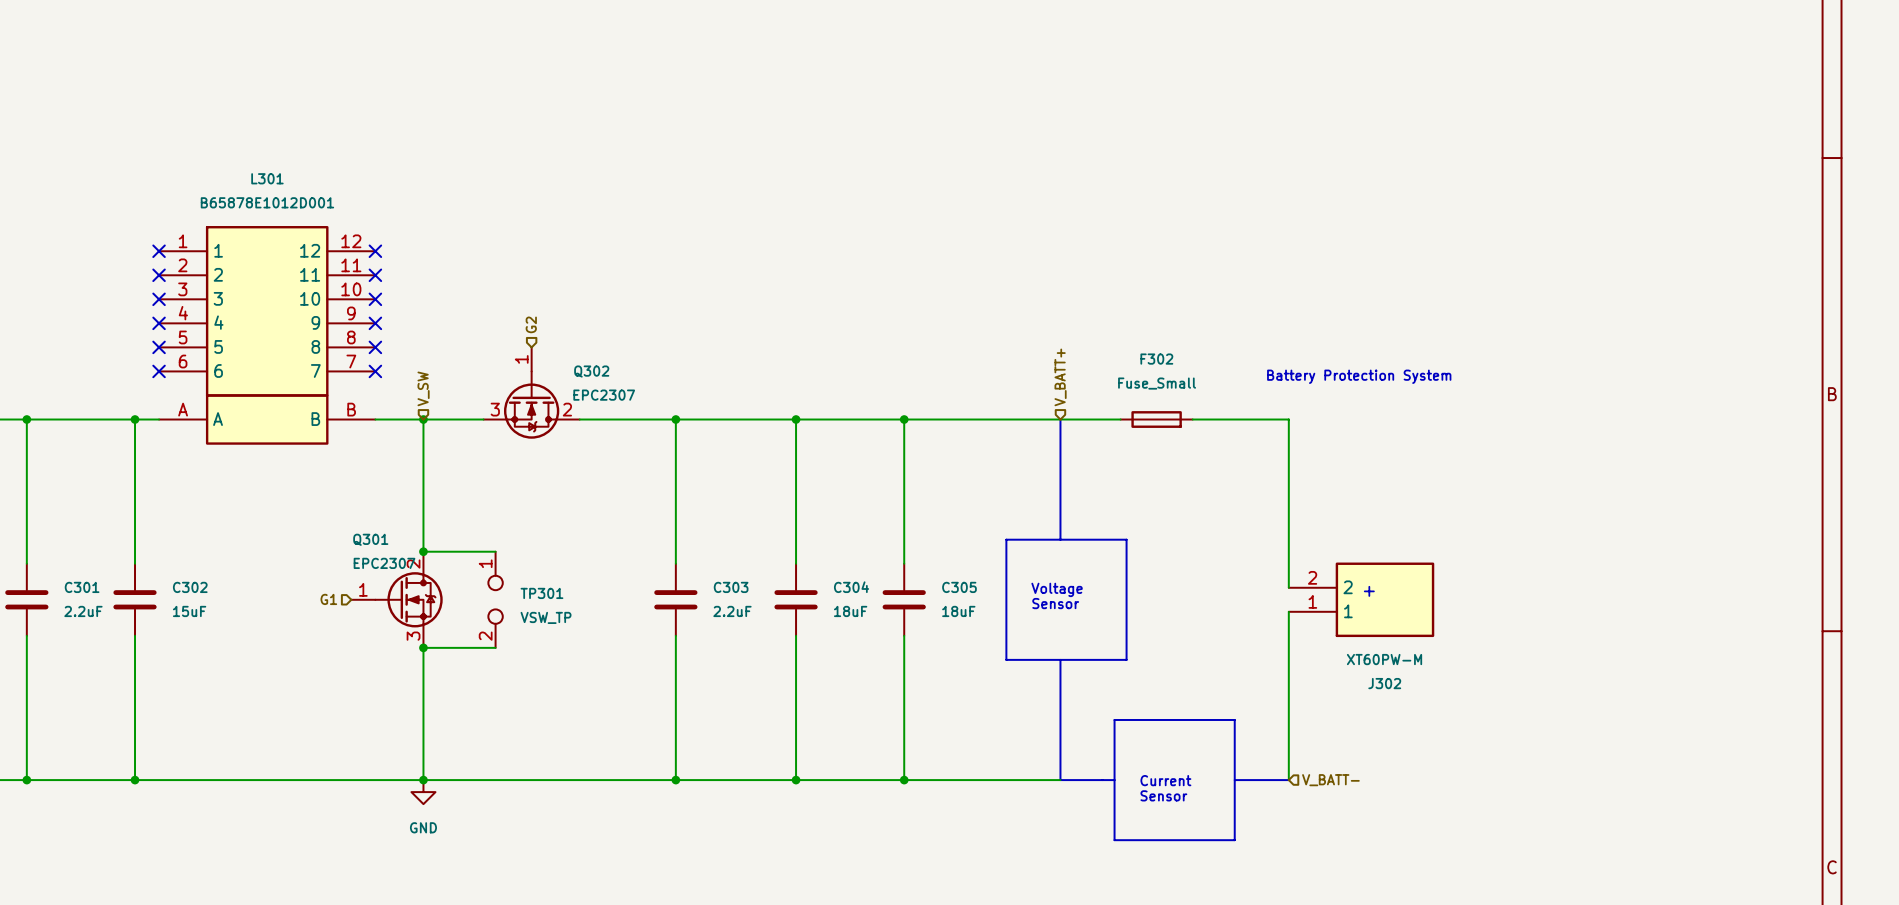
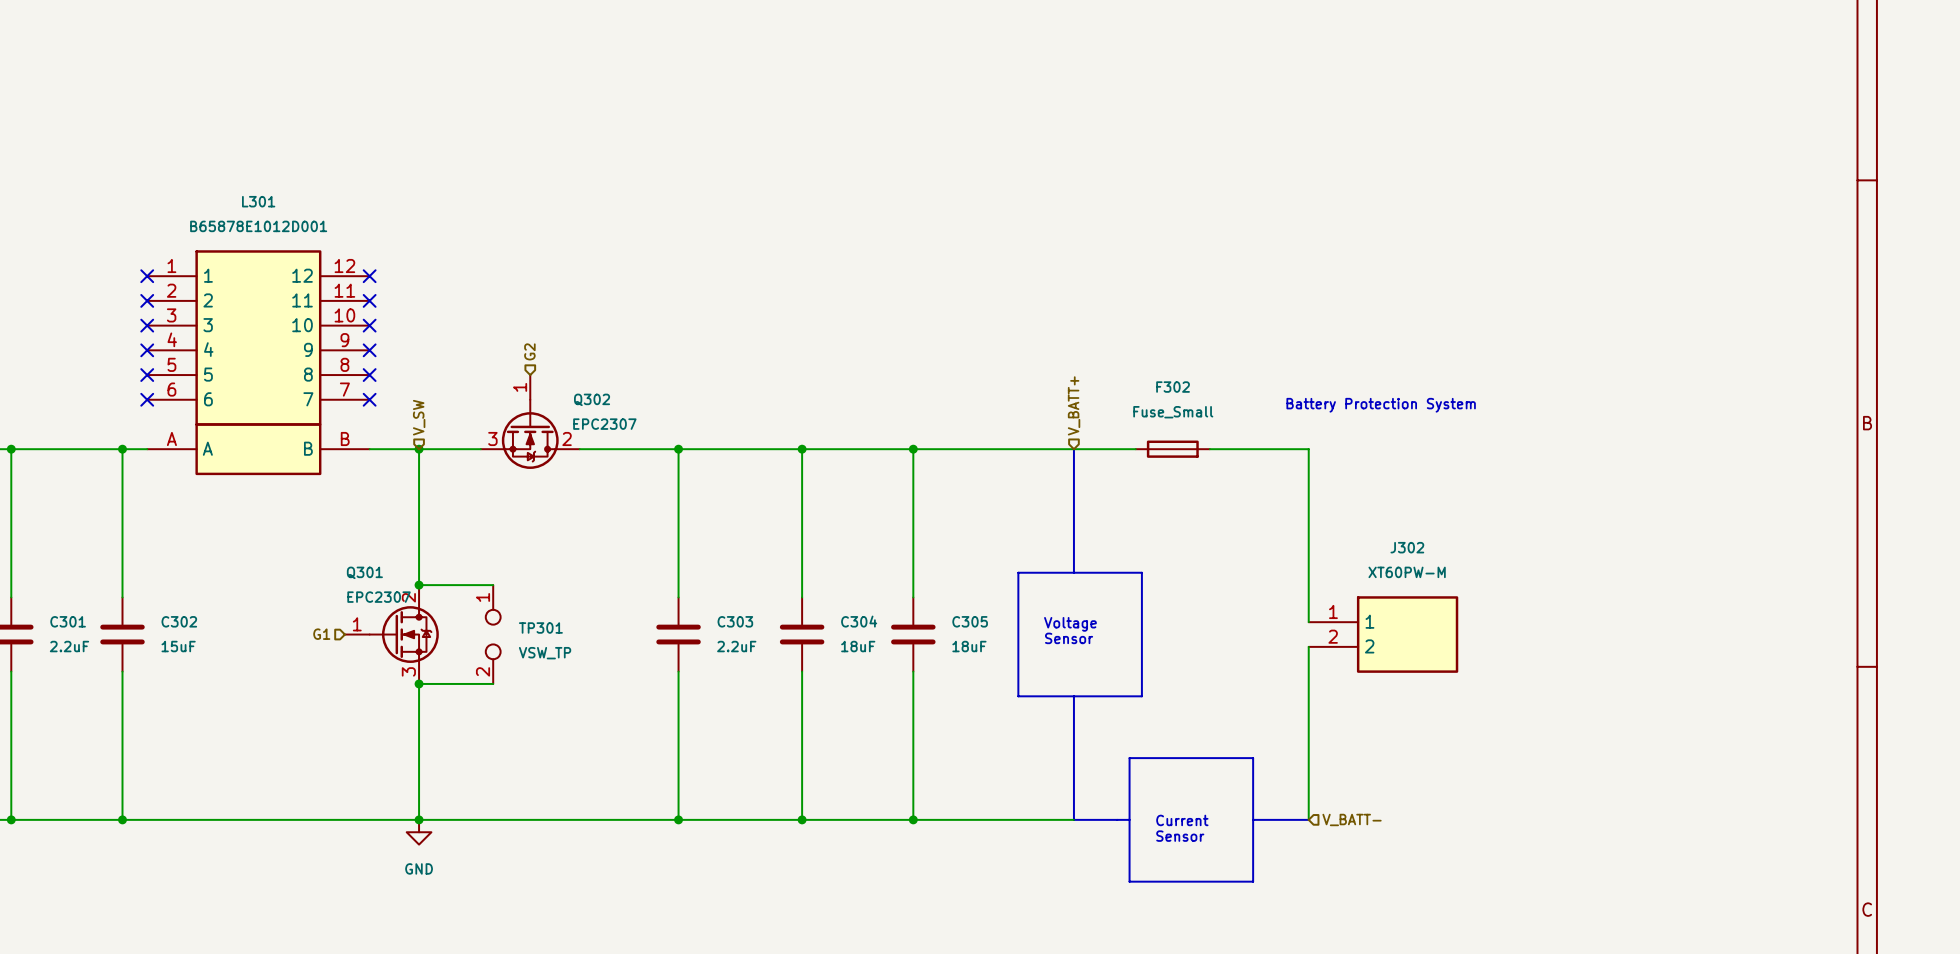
text: + (1369, 591) -> none
J302 flip: as is (1384, 599) -> up-down (1407, 634)

